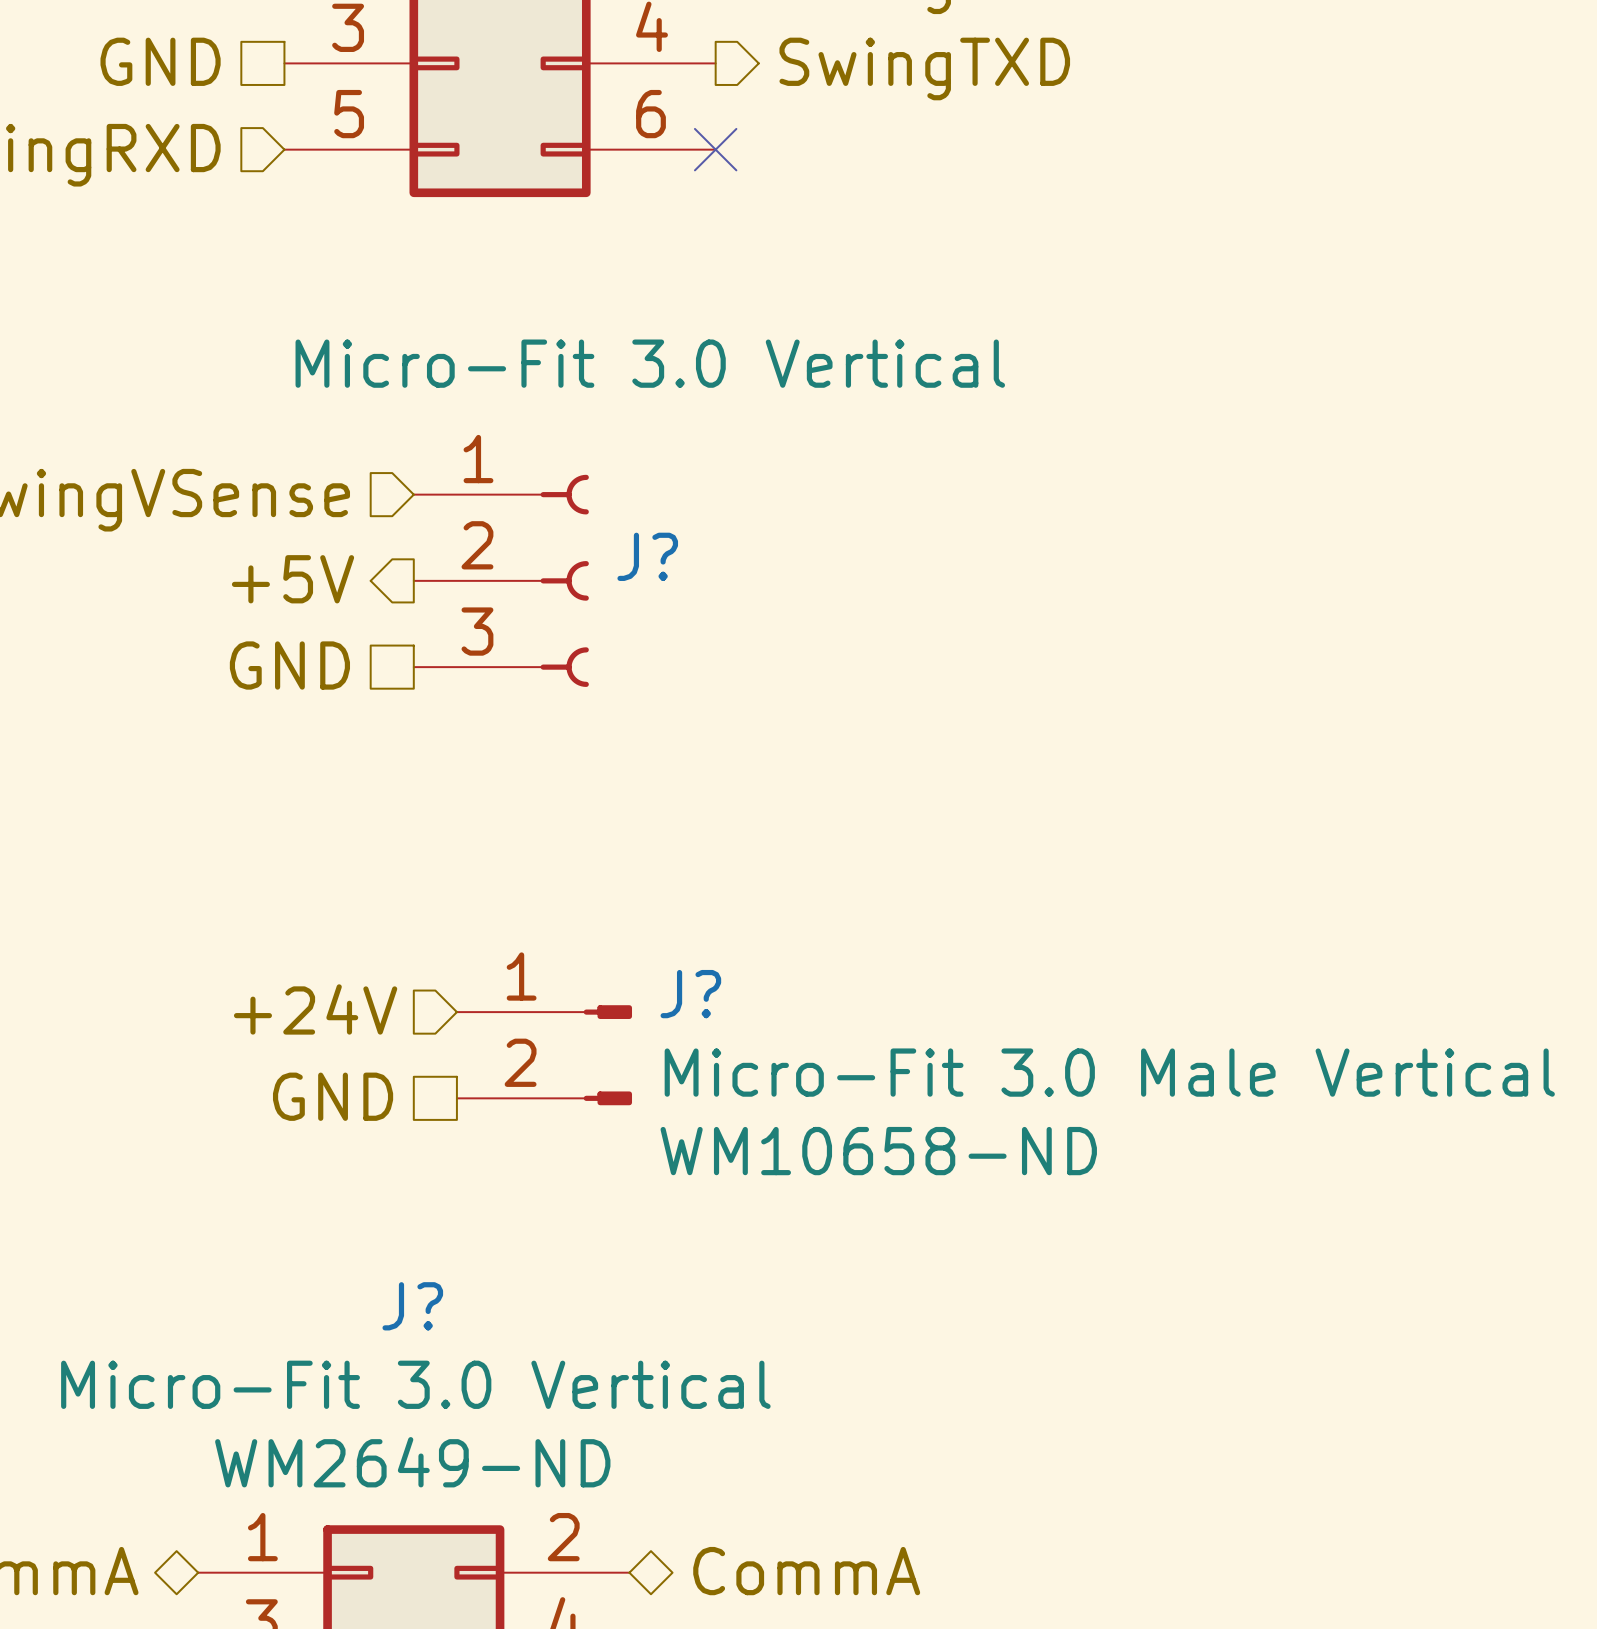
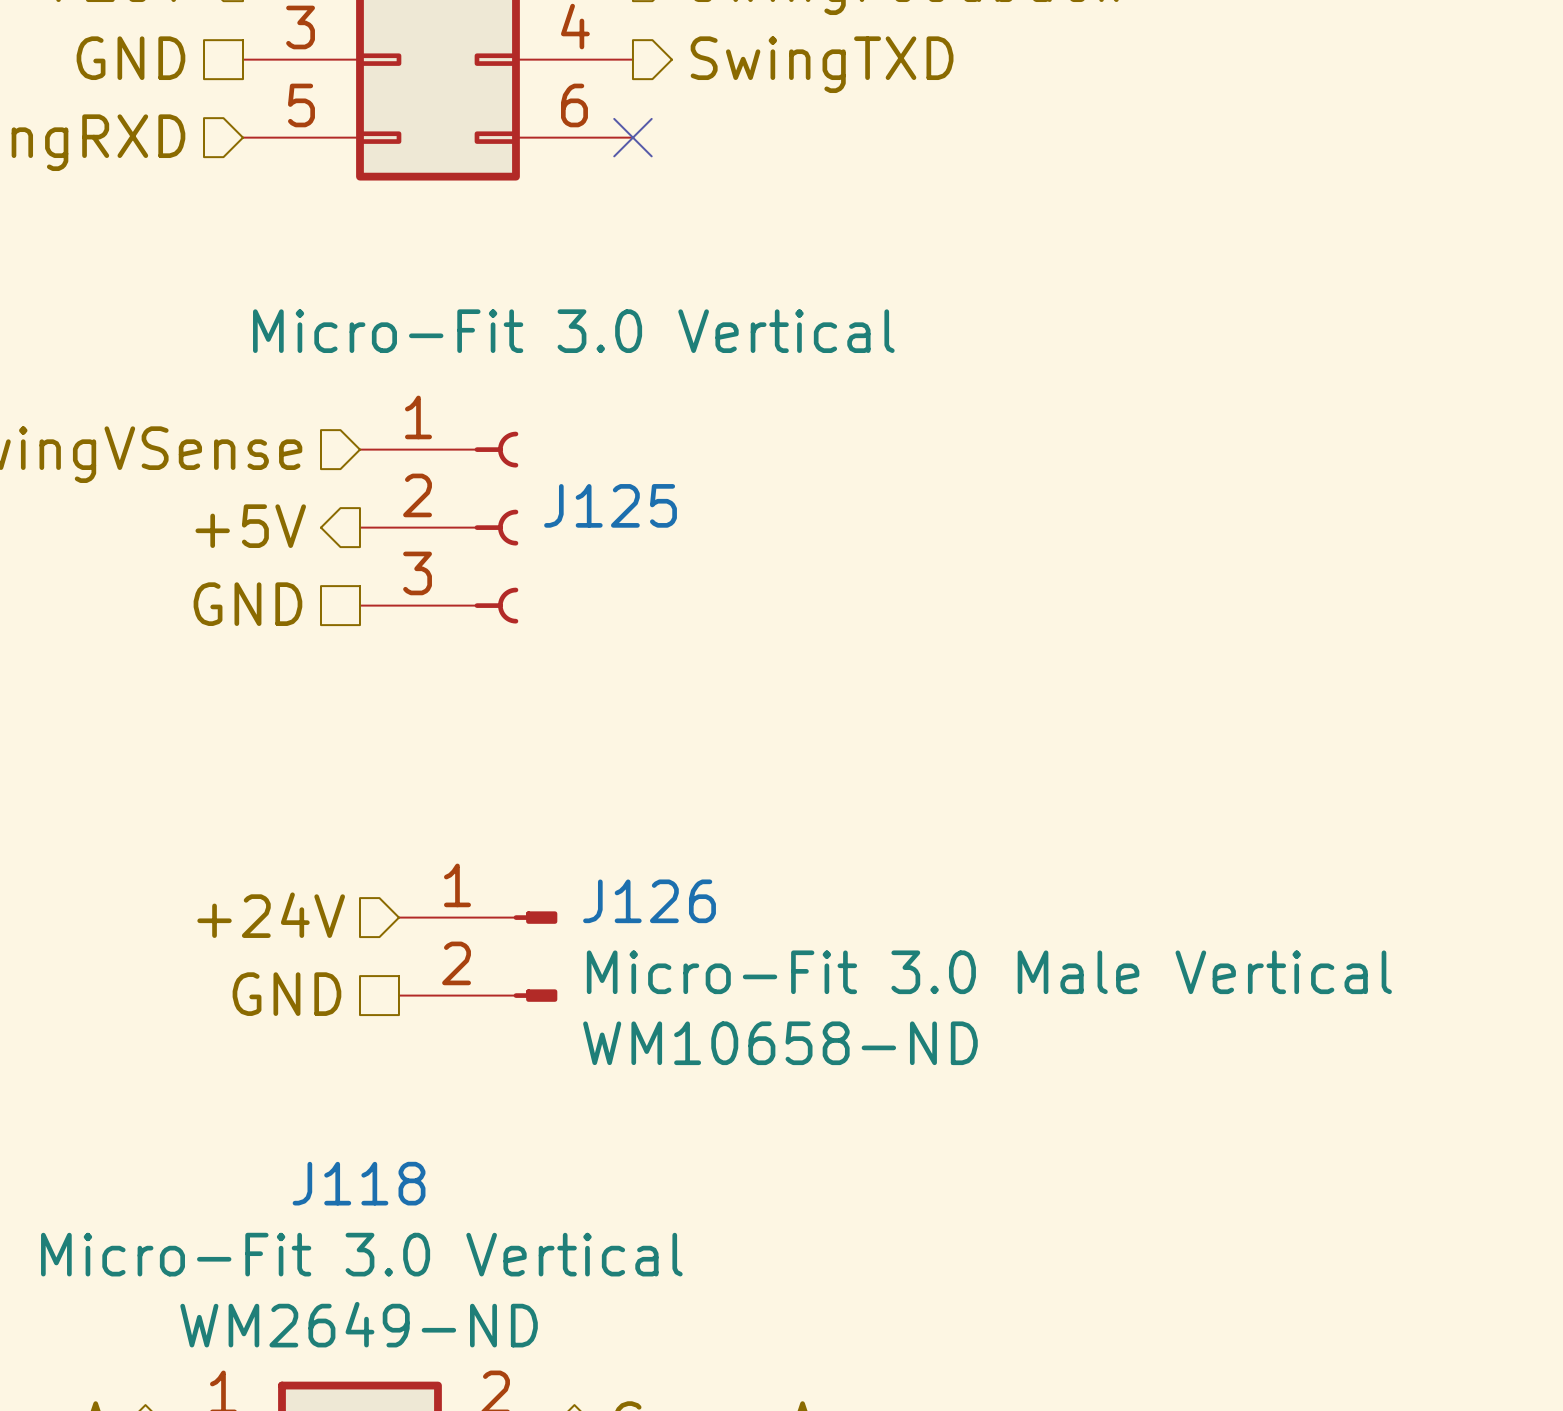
J? name: J? (647, 556) -> J125 (610, 505)
J? name: J? (690, 994) -> J126 (649, 901)
J? name: J? (412, 1306) -> J118 (359, 1183)

